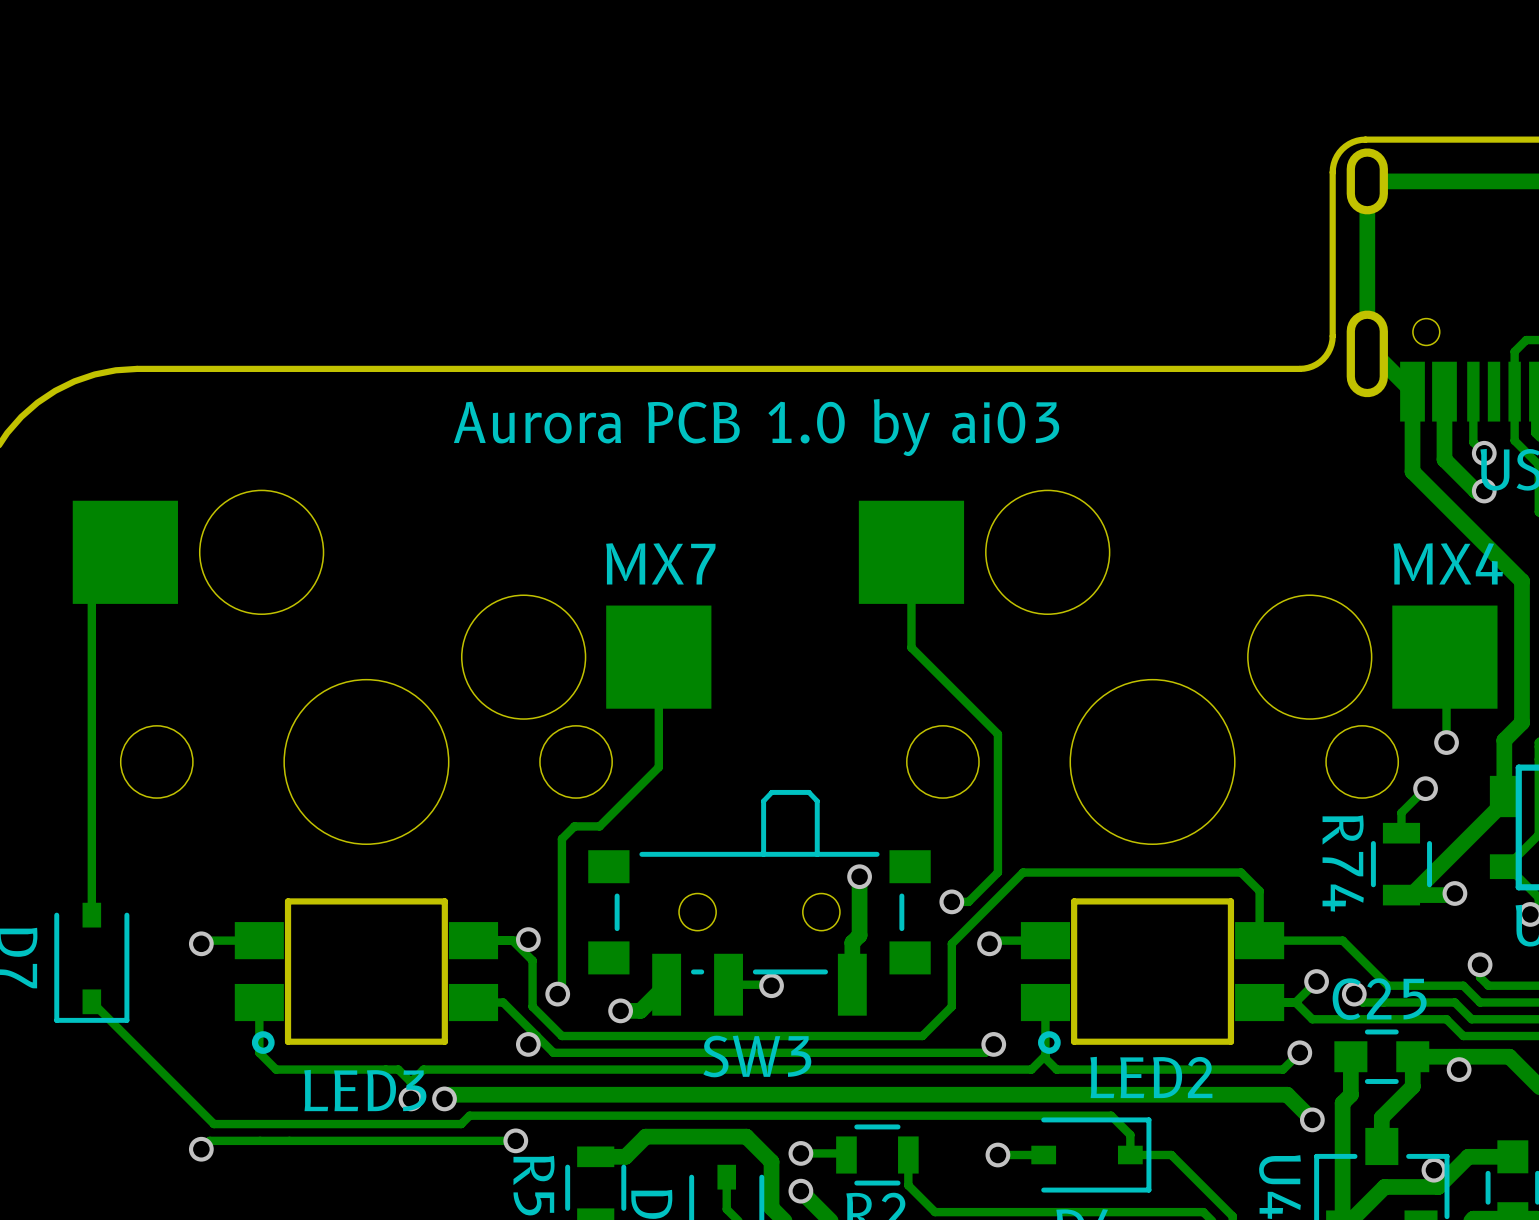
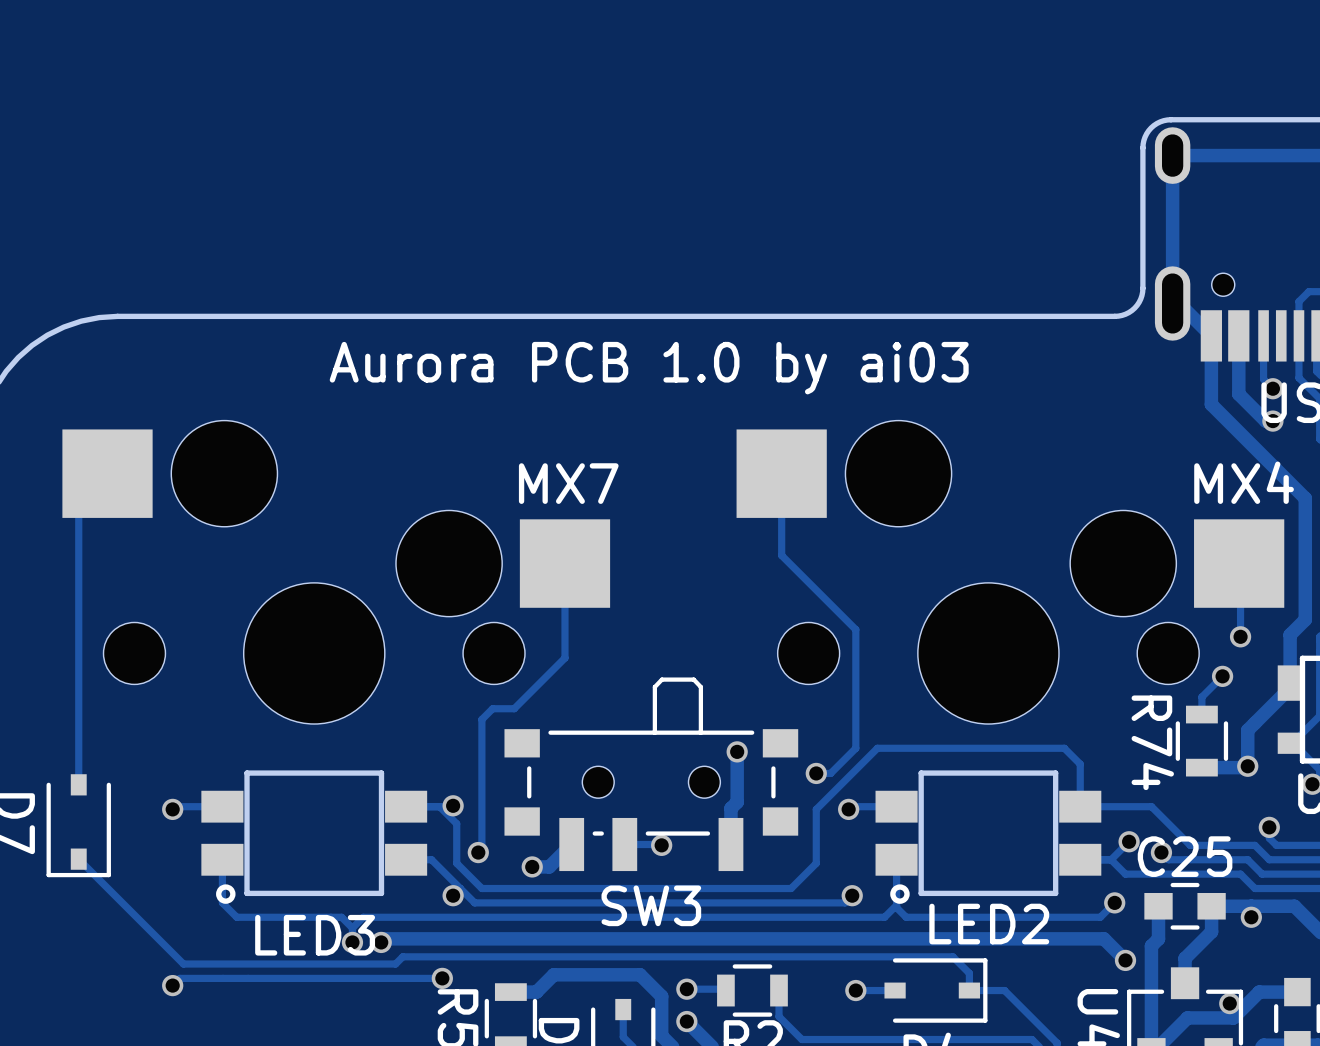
track: (1454, 851) (1411, 895) -> (1247, 730) (1247, 766)

